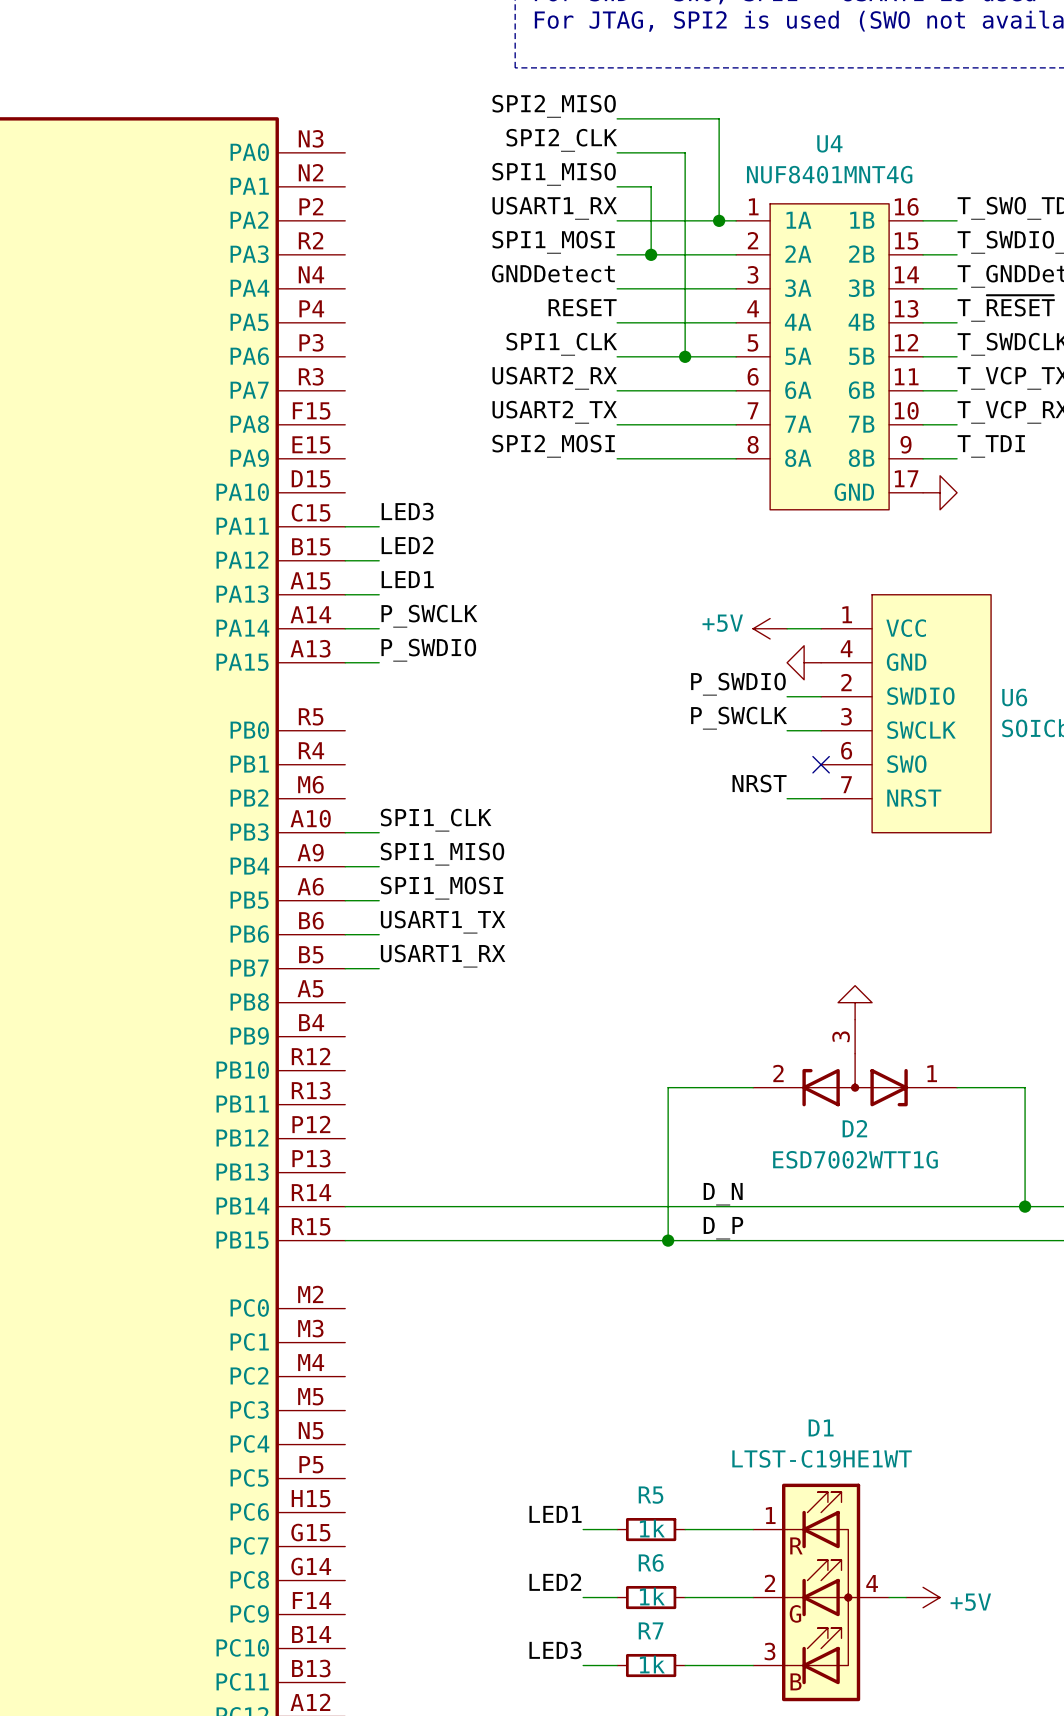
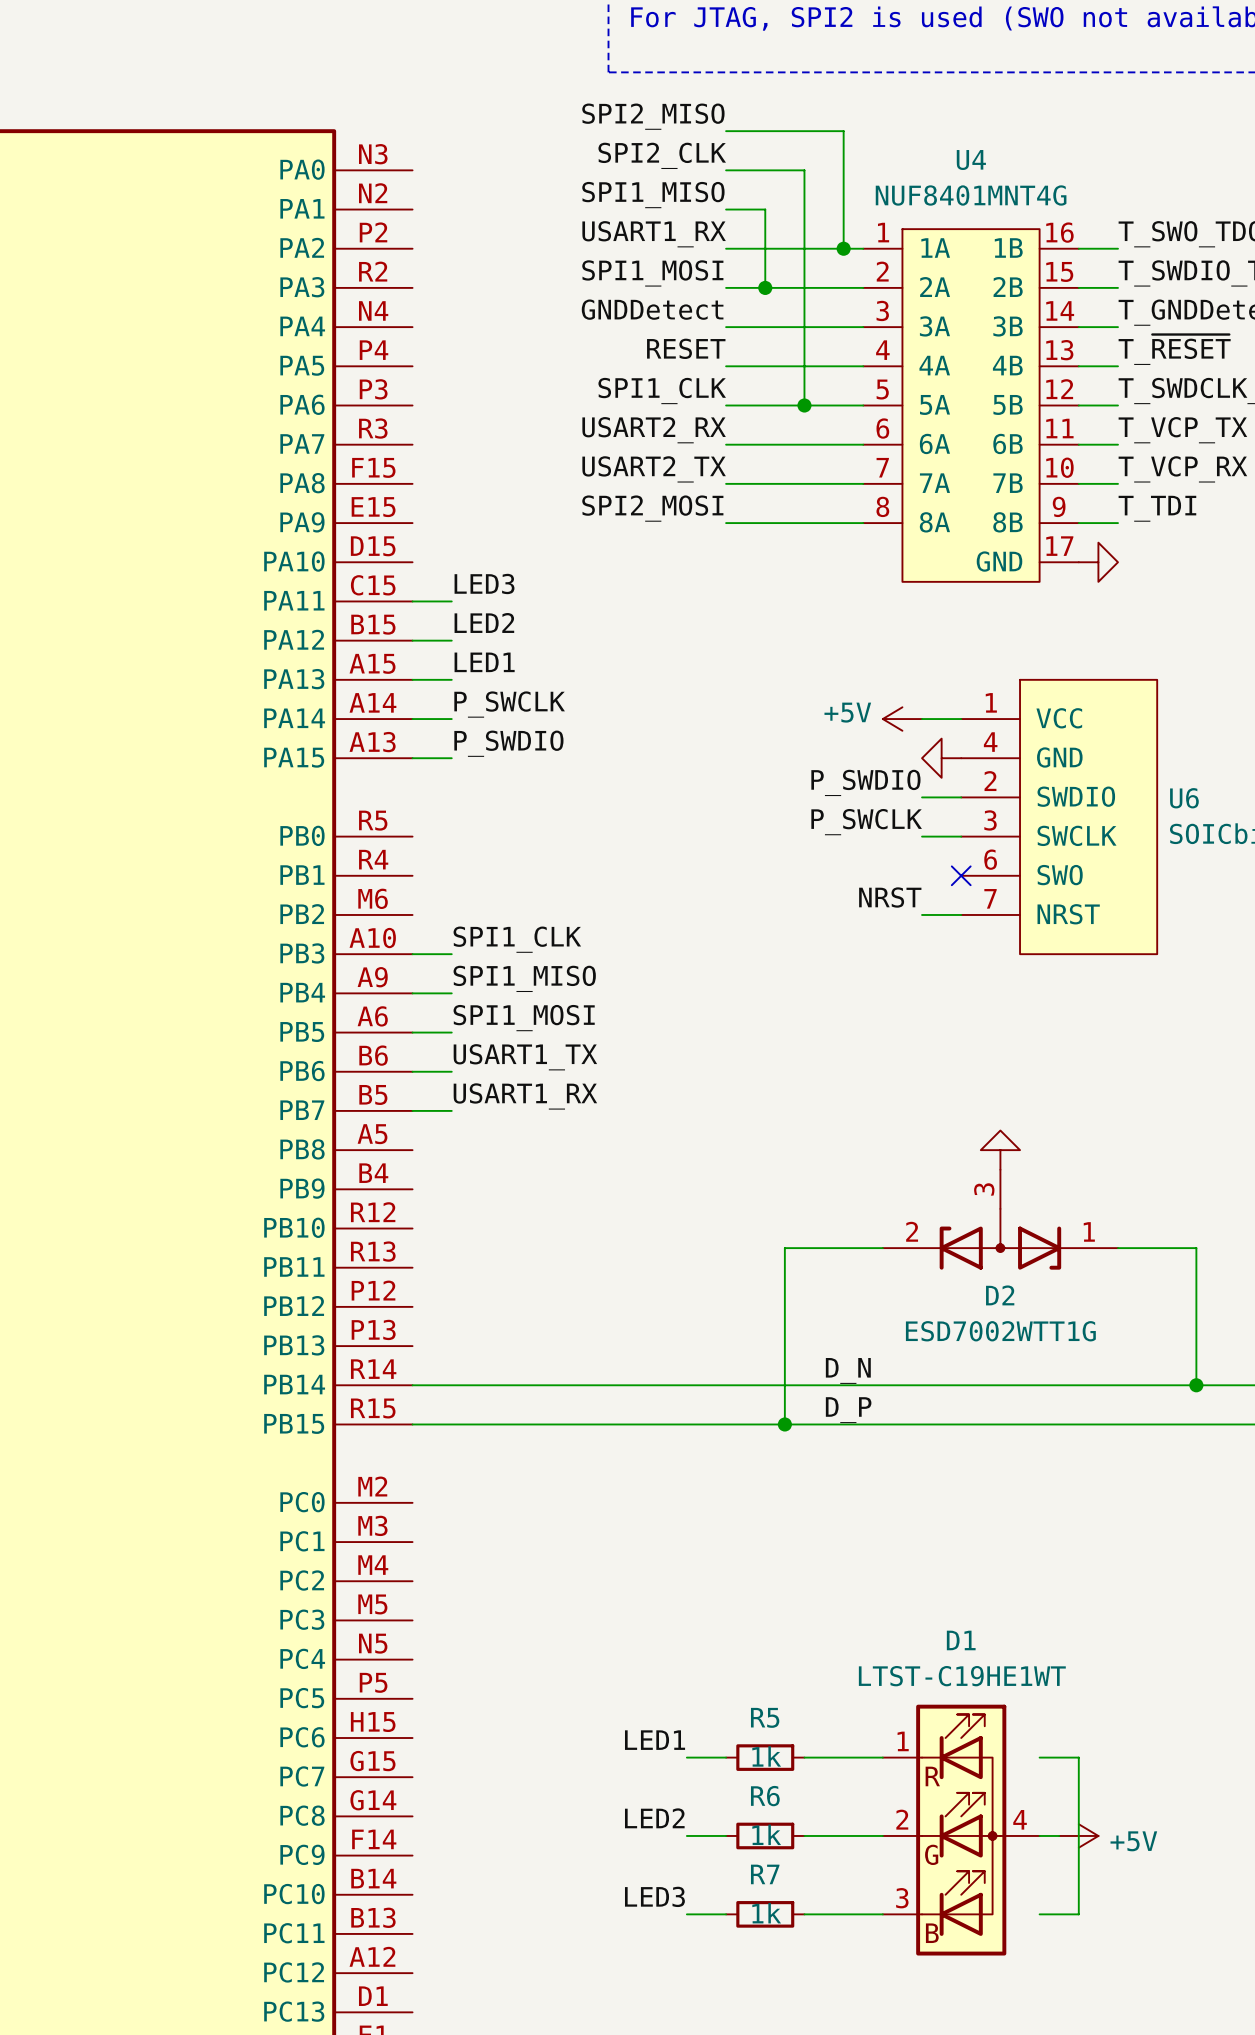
wire: none -> (1039, 1757) (1078, 1757) (1078, 1914) (1039, 1914)

